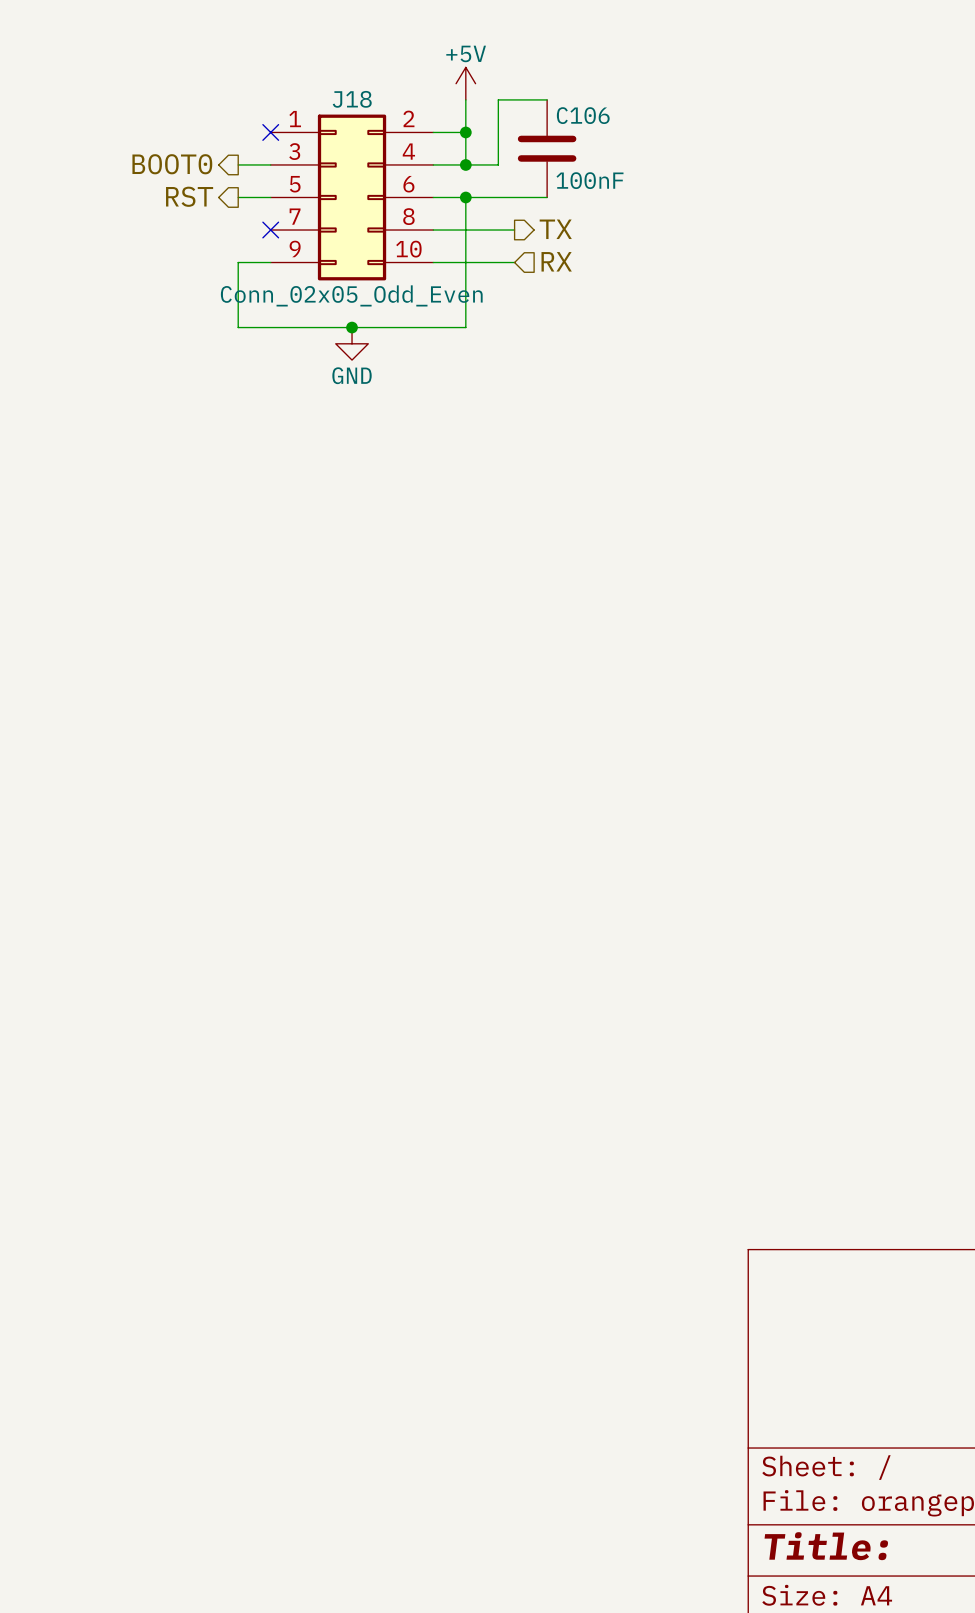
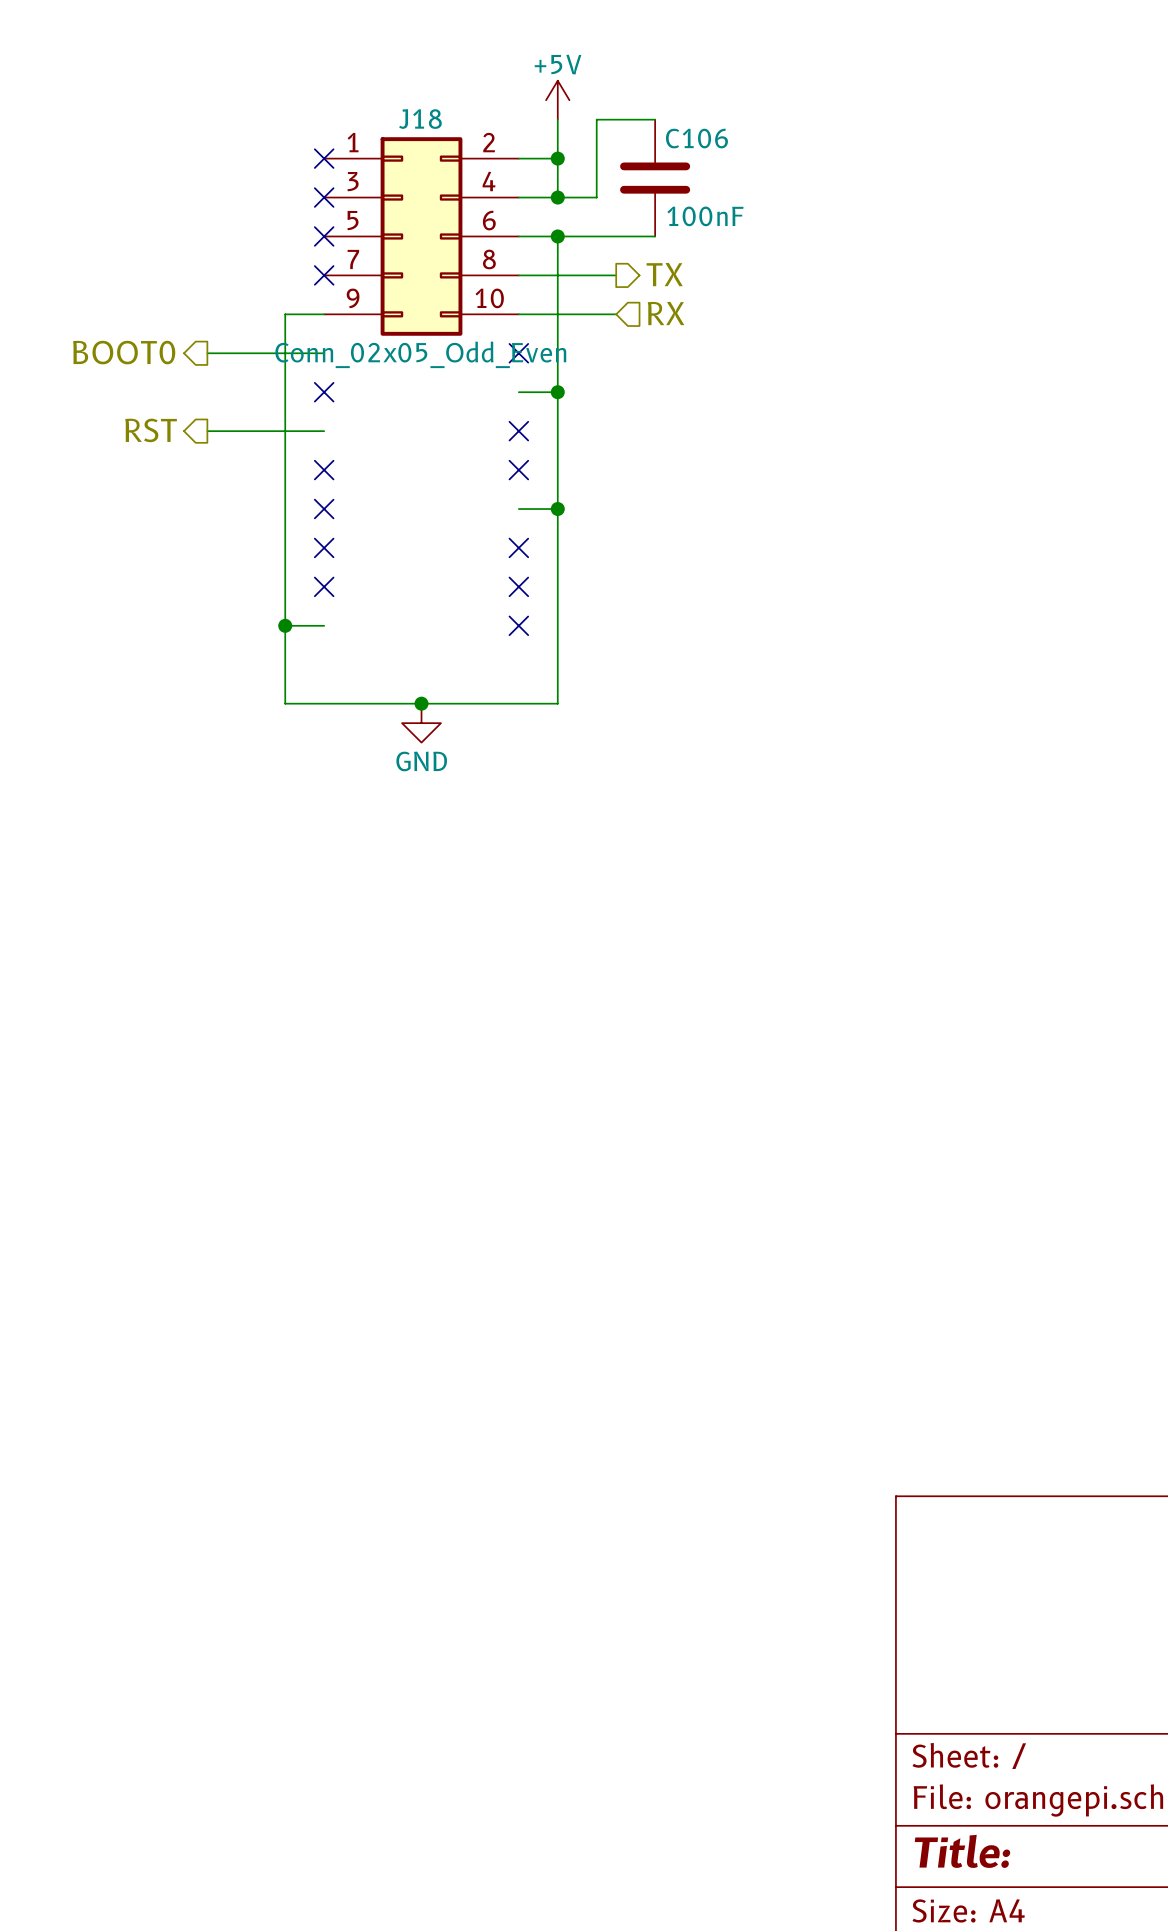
hierarchical label position: BOOT0 (172, 164) -> BOOT0 (124, 352)
wire: (238, 164) (270, 164) -> none
no-connect mark: none -> (324, 197)
hierarchical label position: RST (189, 196) -> RST (151, 430)
wire: (238, 197) (270, 197) -> (518, 509) (557, 509)
no-connect mark: none -> (324, 236)
wire: none -> (207, 353) (324, 353)
no-connect mark: none -> (518, 353)
wire: (238, 327) (433, 327) -> (285, 392) (285, 703) (557, 703) (557, 392)
no-connect mark: none -> (324, 392)
junction: (352, 327) -> none
junction: none -> (557, 392)
power symbol position: GND (352, 343) -> GND (421, 723)
wire: none -> (207, 431) (324, 431)
no-connect mark: none -> (518, 431)
no-connect mark: none -> (324, 470)
no-connect mark: none -> (518, 470)
no-connect mark: none -> (324, 509)
junction: none -> (557, 509)
no-connect mark: none -> (324, 547)
no-connect mark: none -> (518, 547)
no-connect mark: none -> (324, 586)
no-connect mark: none -> (518, 586)
wire: none -> (285, 625) (324, 625)
junction: none -> (285, 625)
no-connect mark: none -> (518, 625)
junction: none -> (421, 703)

